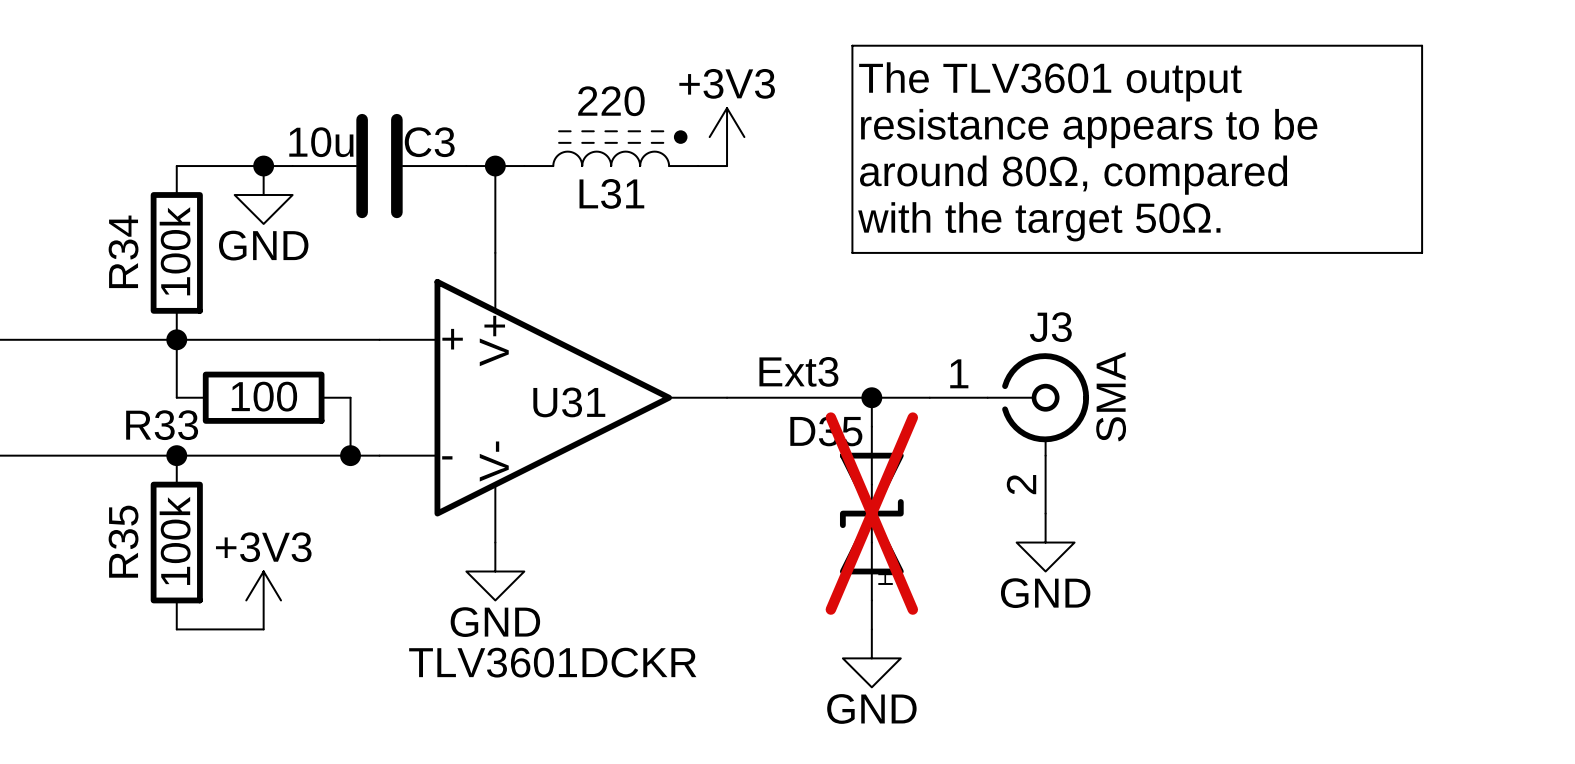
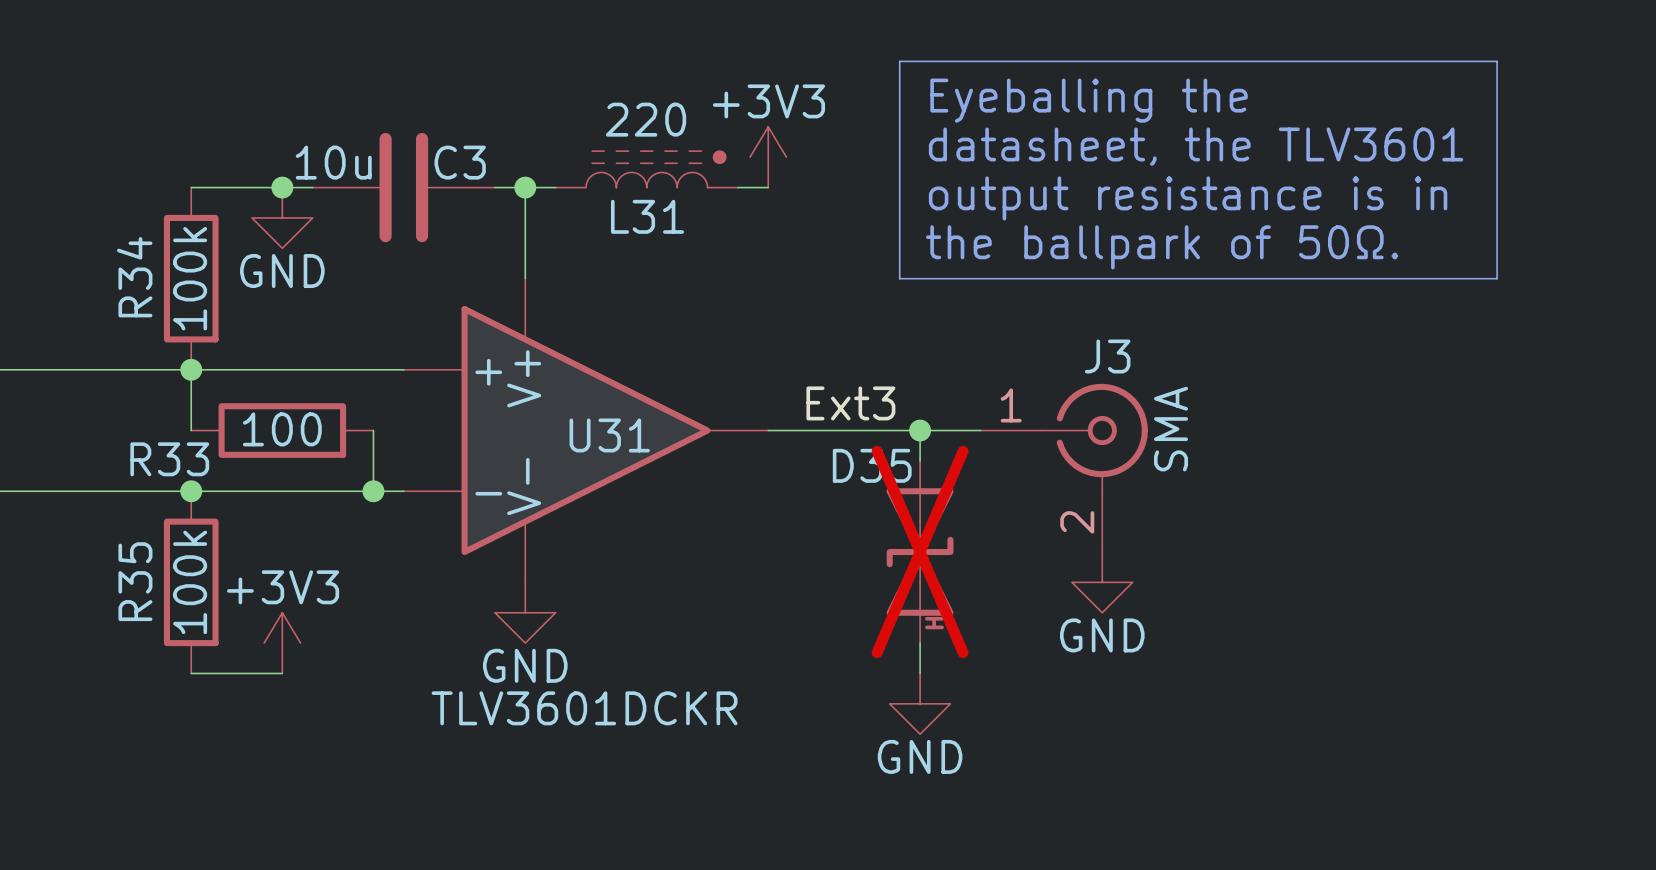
text: The TLV3601 output (1050, 81) -> Eyeballing the (1089, 100)
text: resistance appears to be (1089, 128) -> datasheet, the TLV3601 (1196, 146)
text: around 80Ω, compared (1073, 175) -> output resistance is in (1188, 198)
text: with the target 50Ω. (1039, 221) -> the ballpark of 50Ω. (1162, 247)

